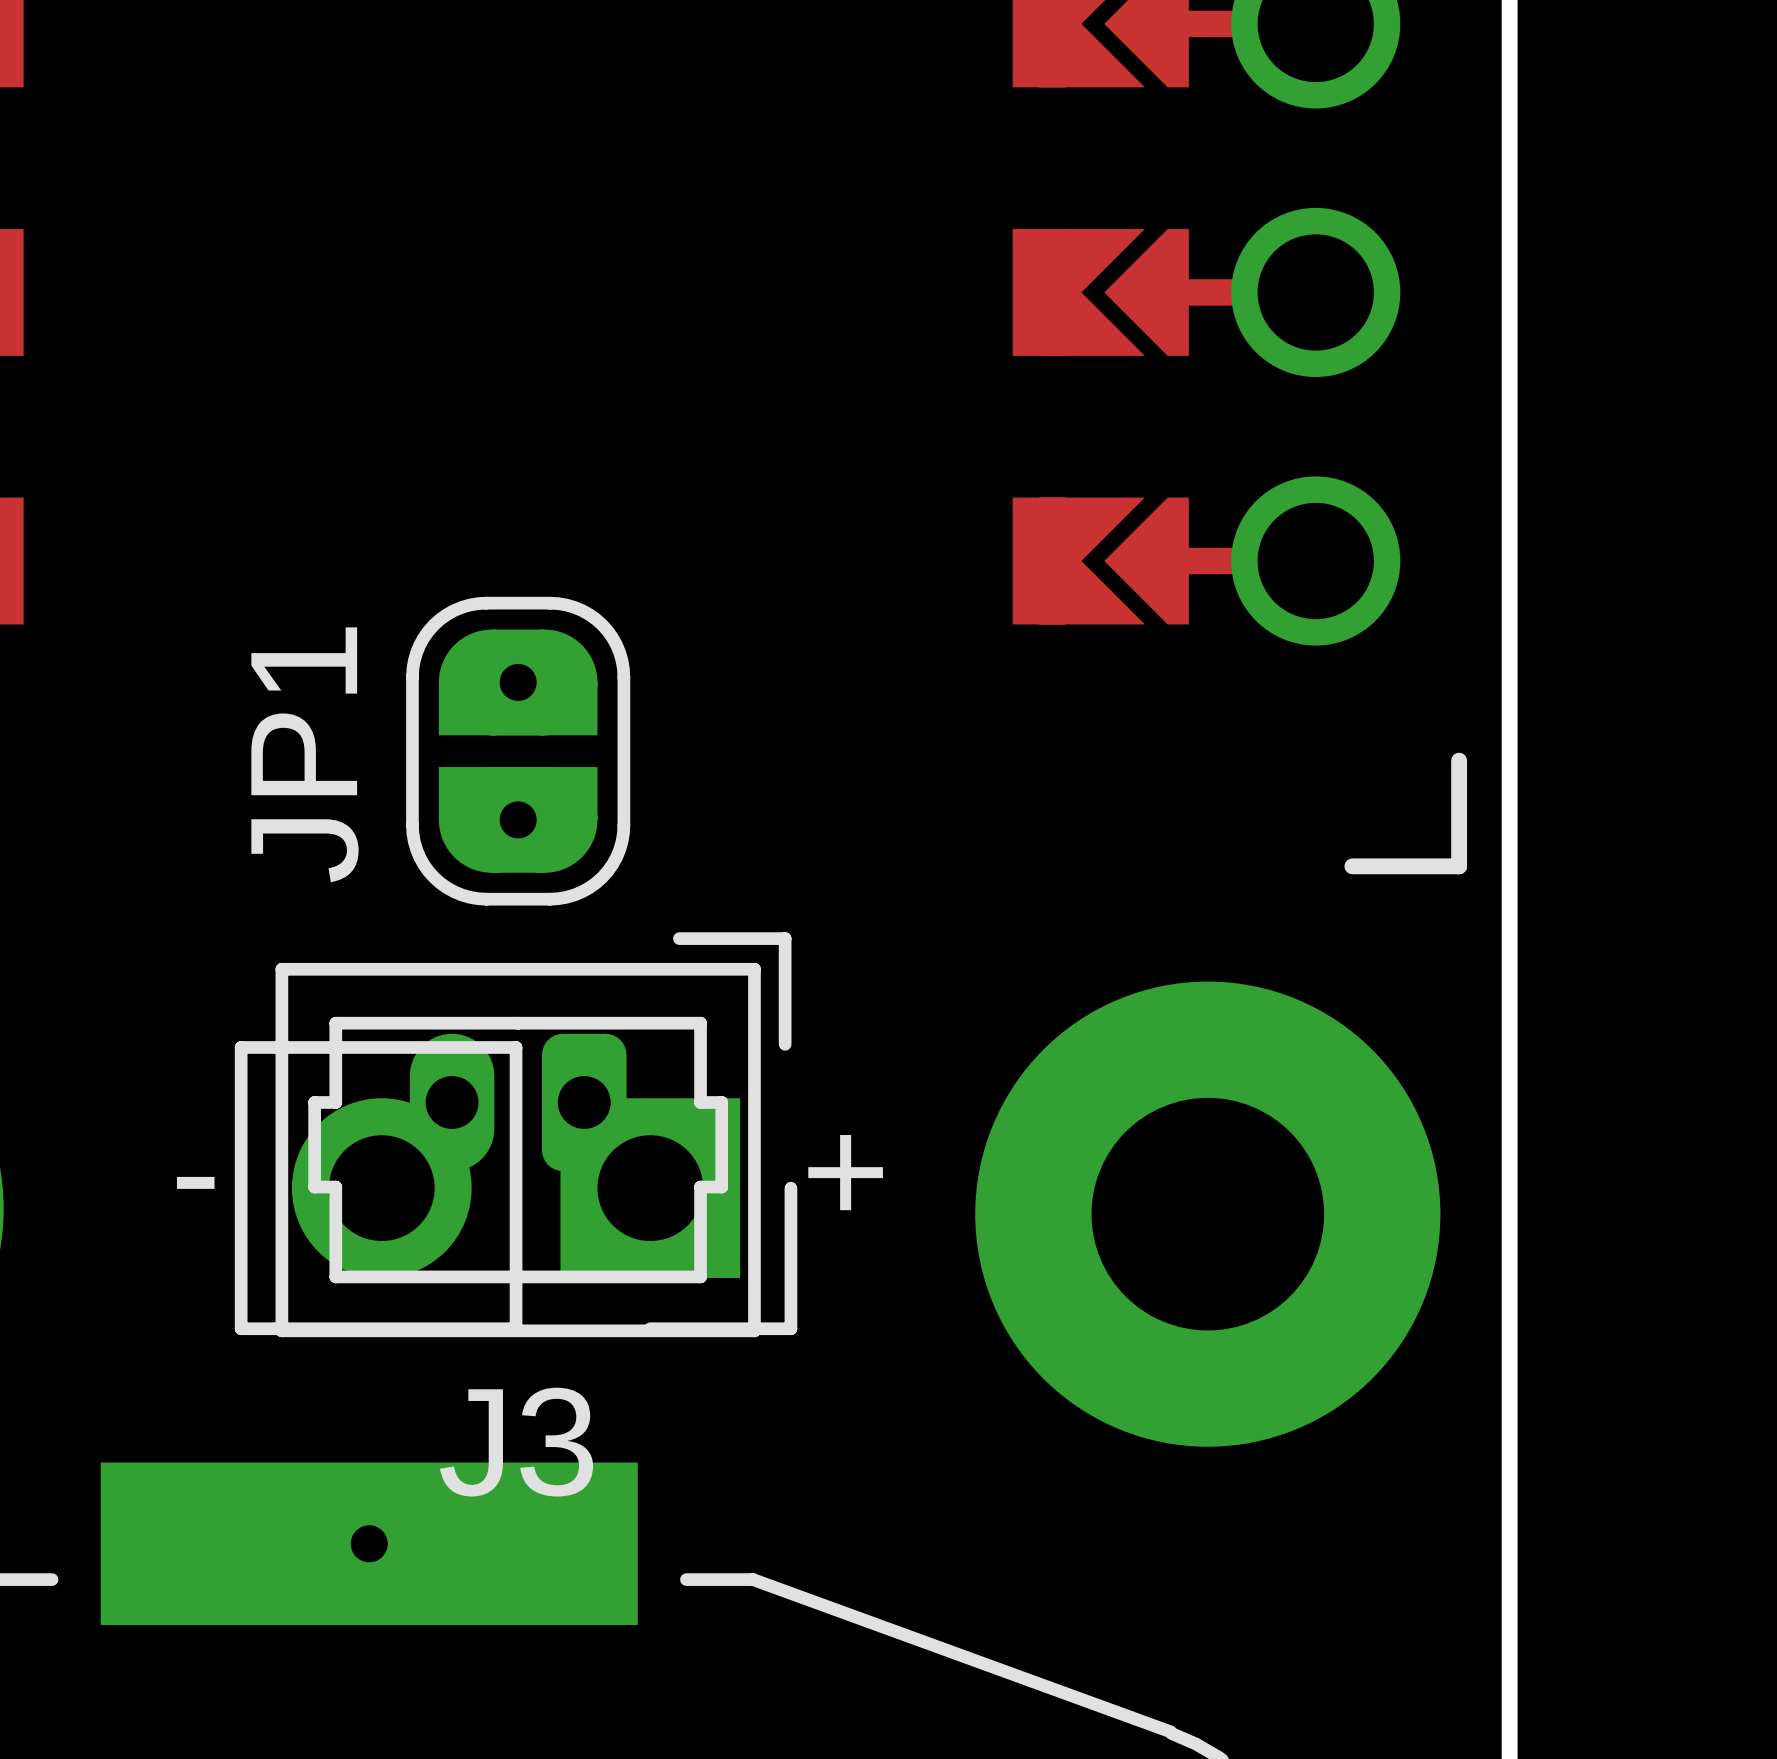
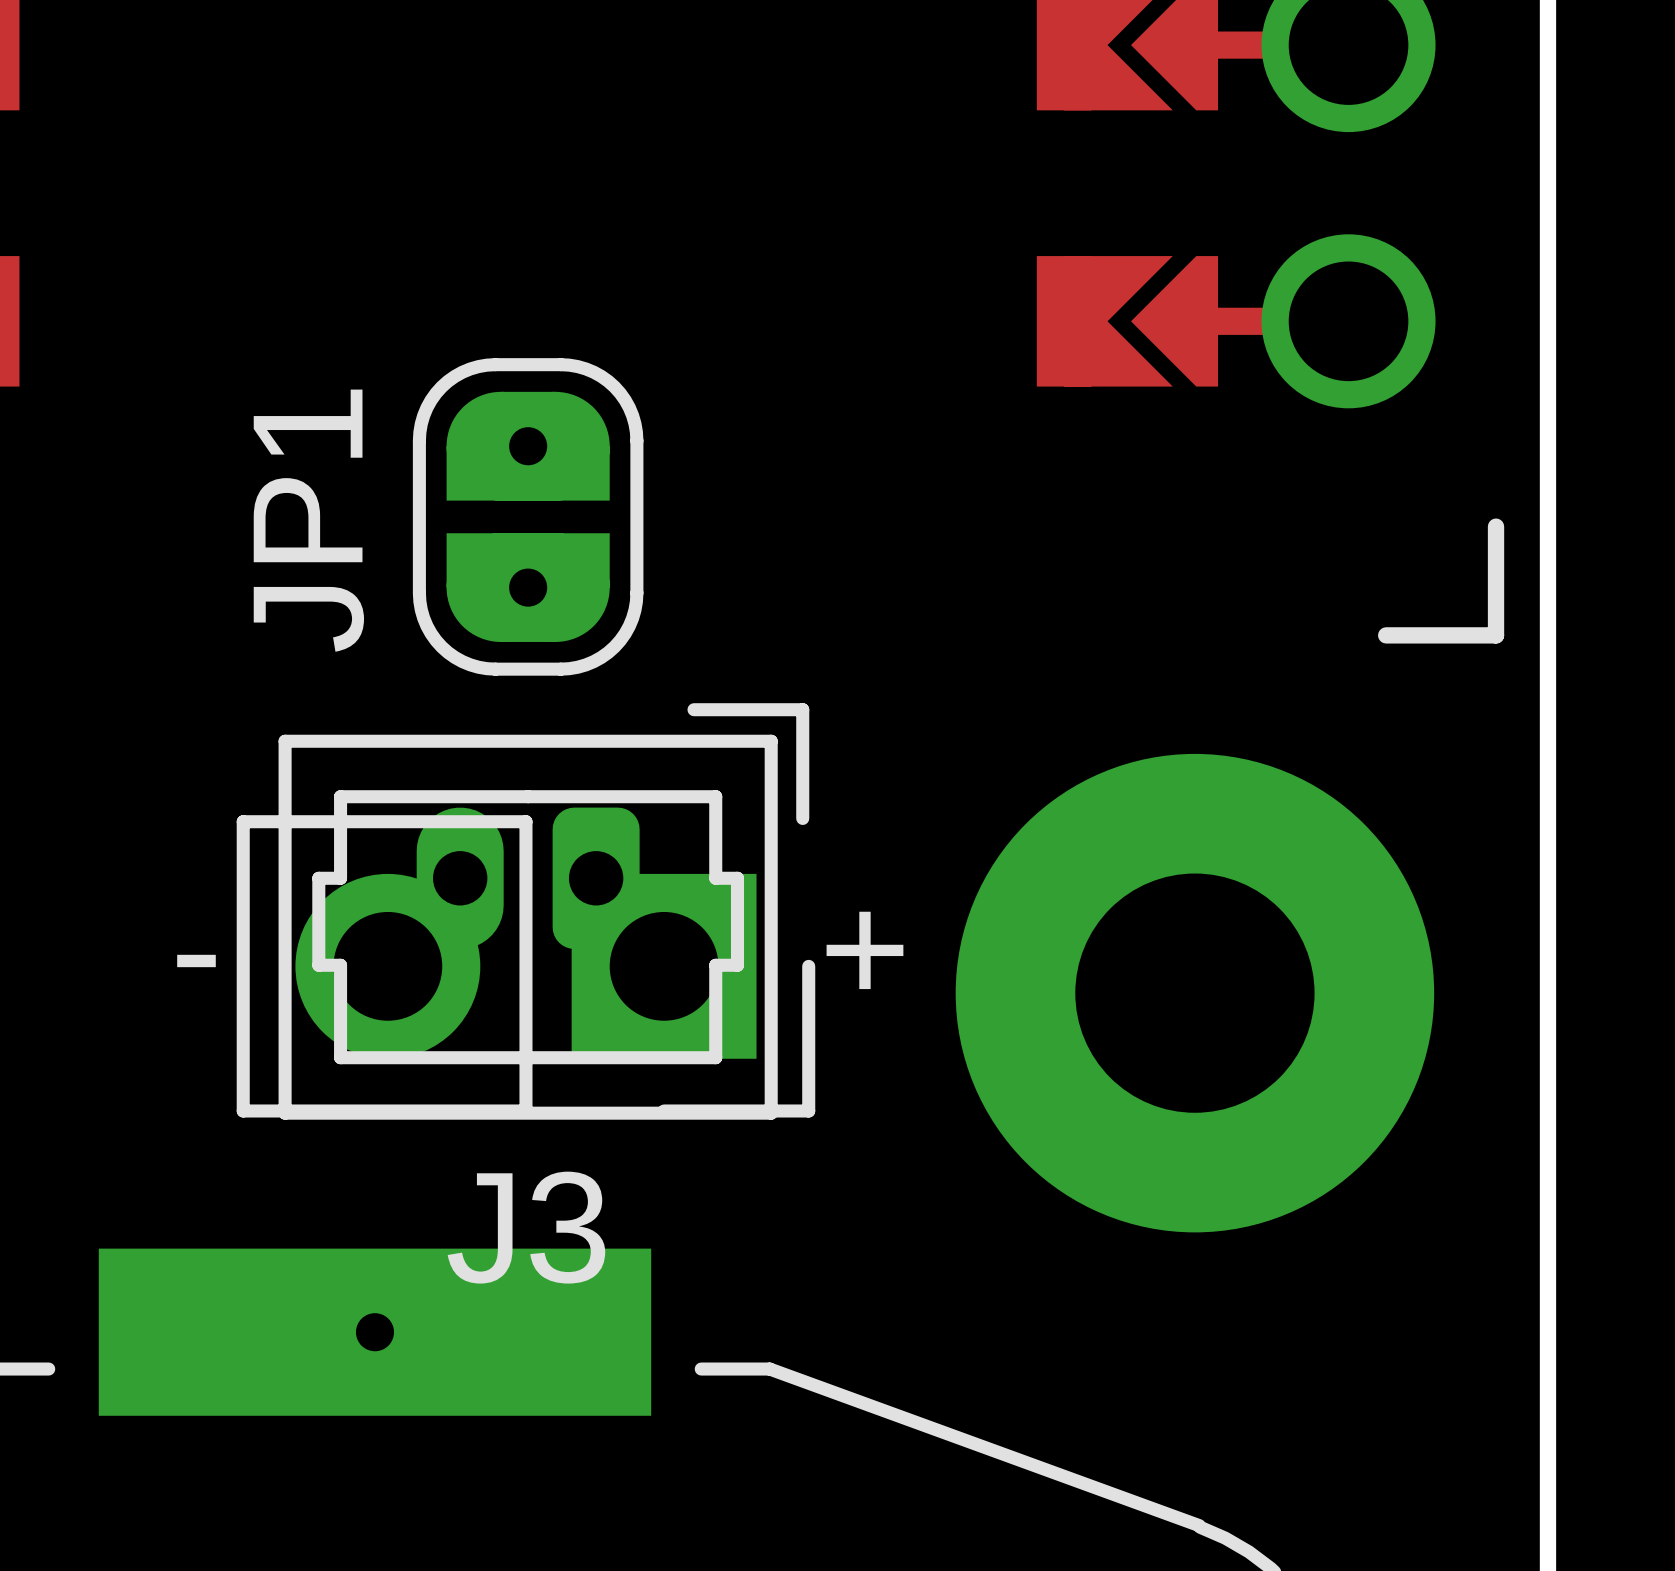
part position: (1207, 1214) -> (1194, 993)

